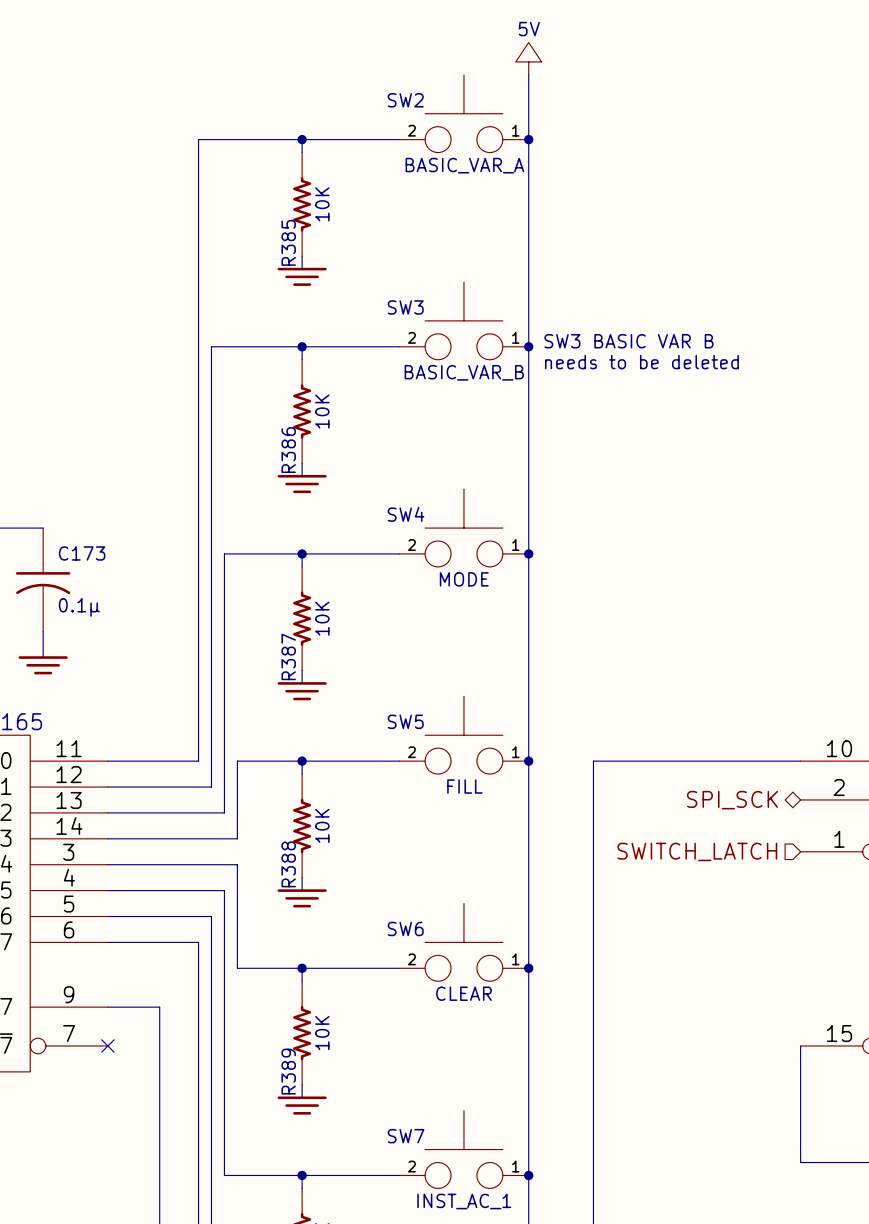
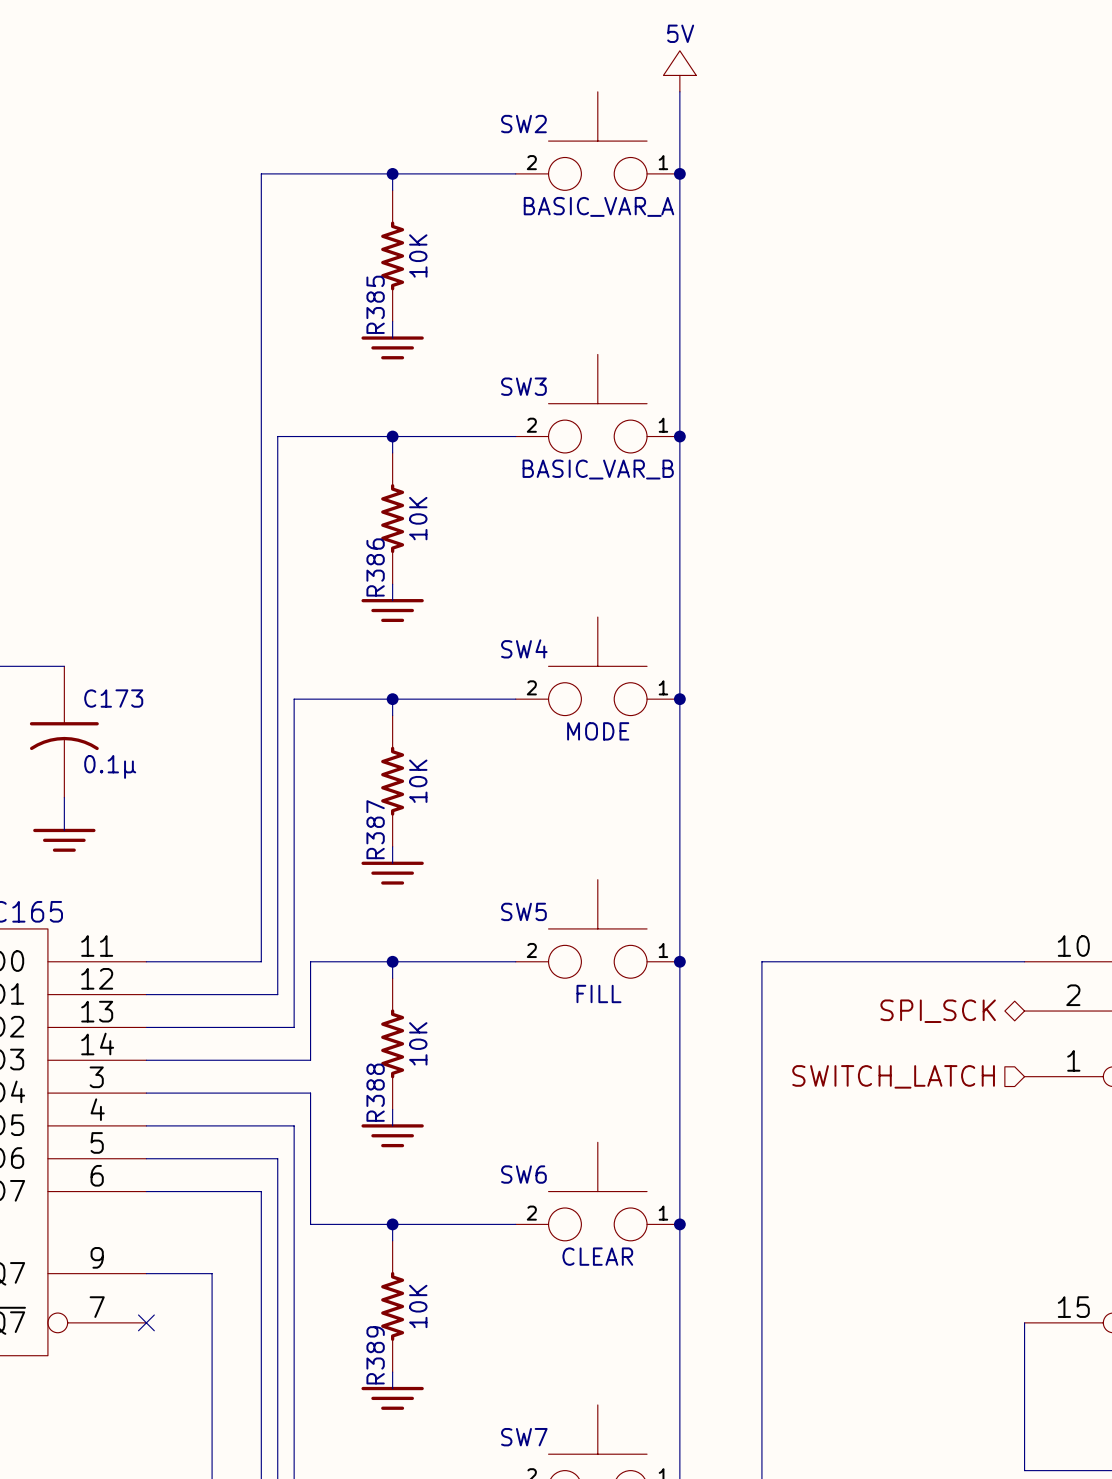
text: SW3 BASIC VAR B (629, 341) -> none
text: needs to be deleted (641, 362) -> none

